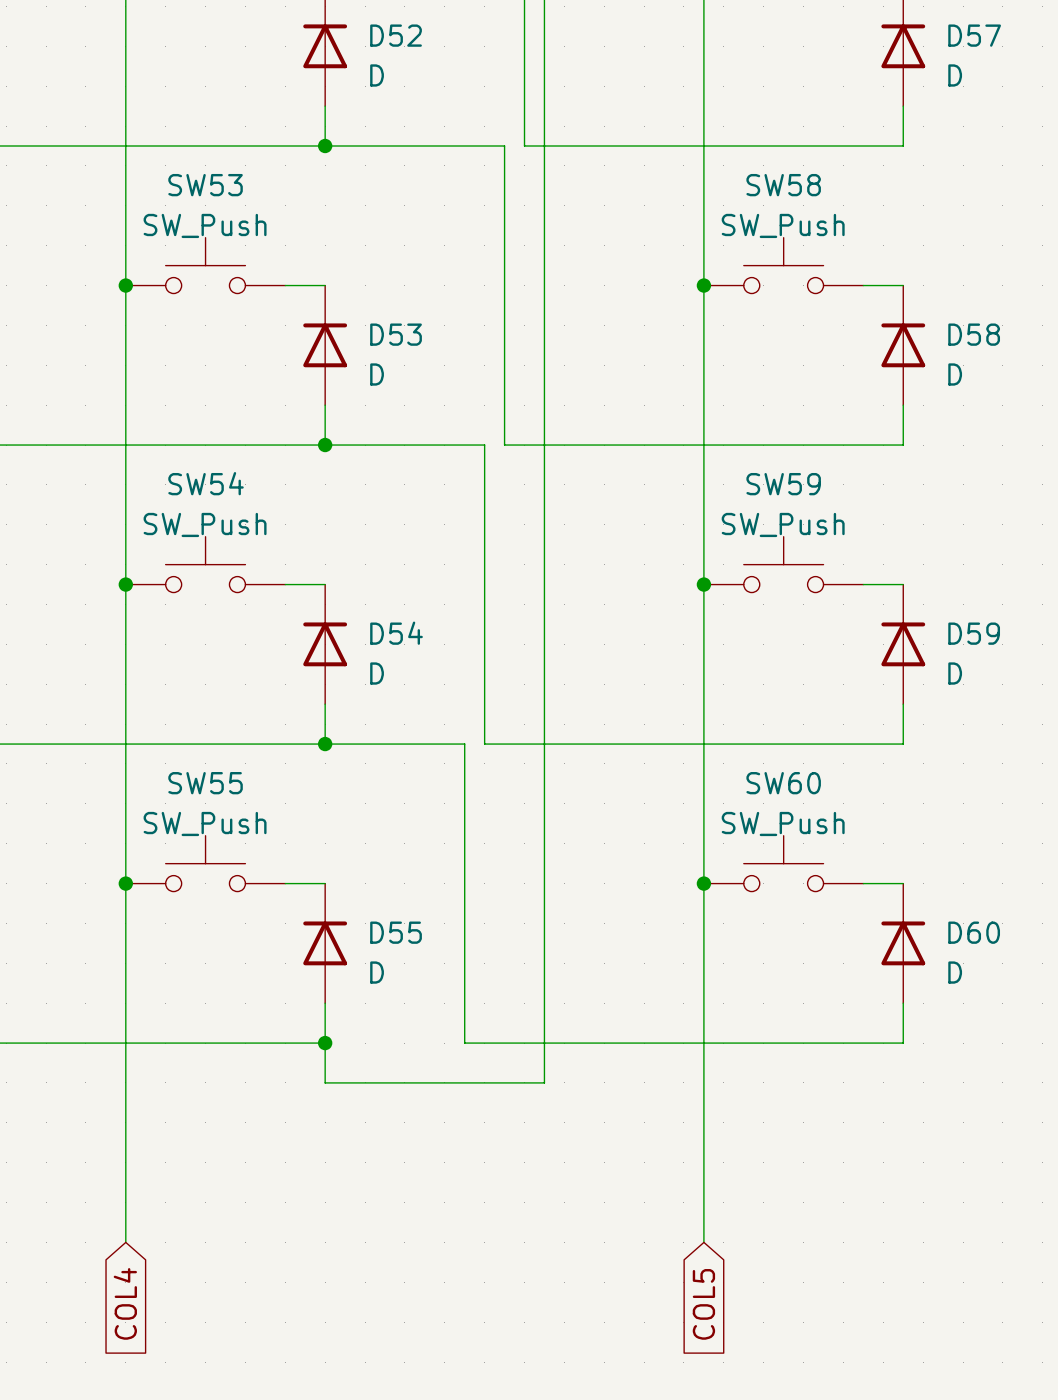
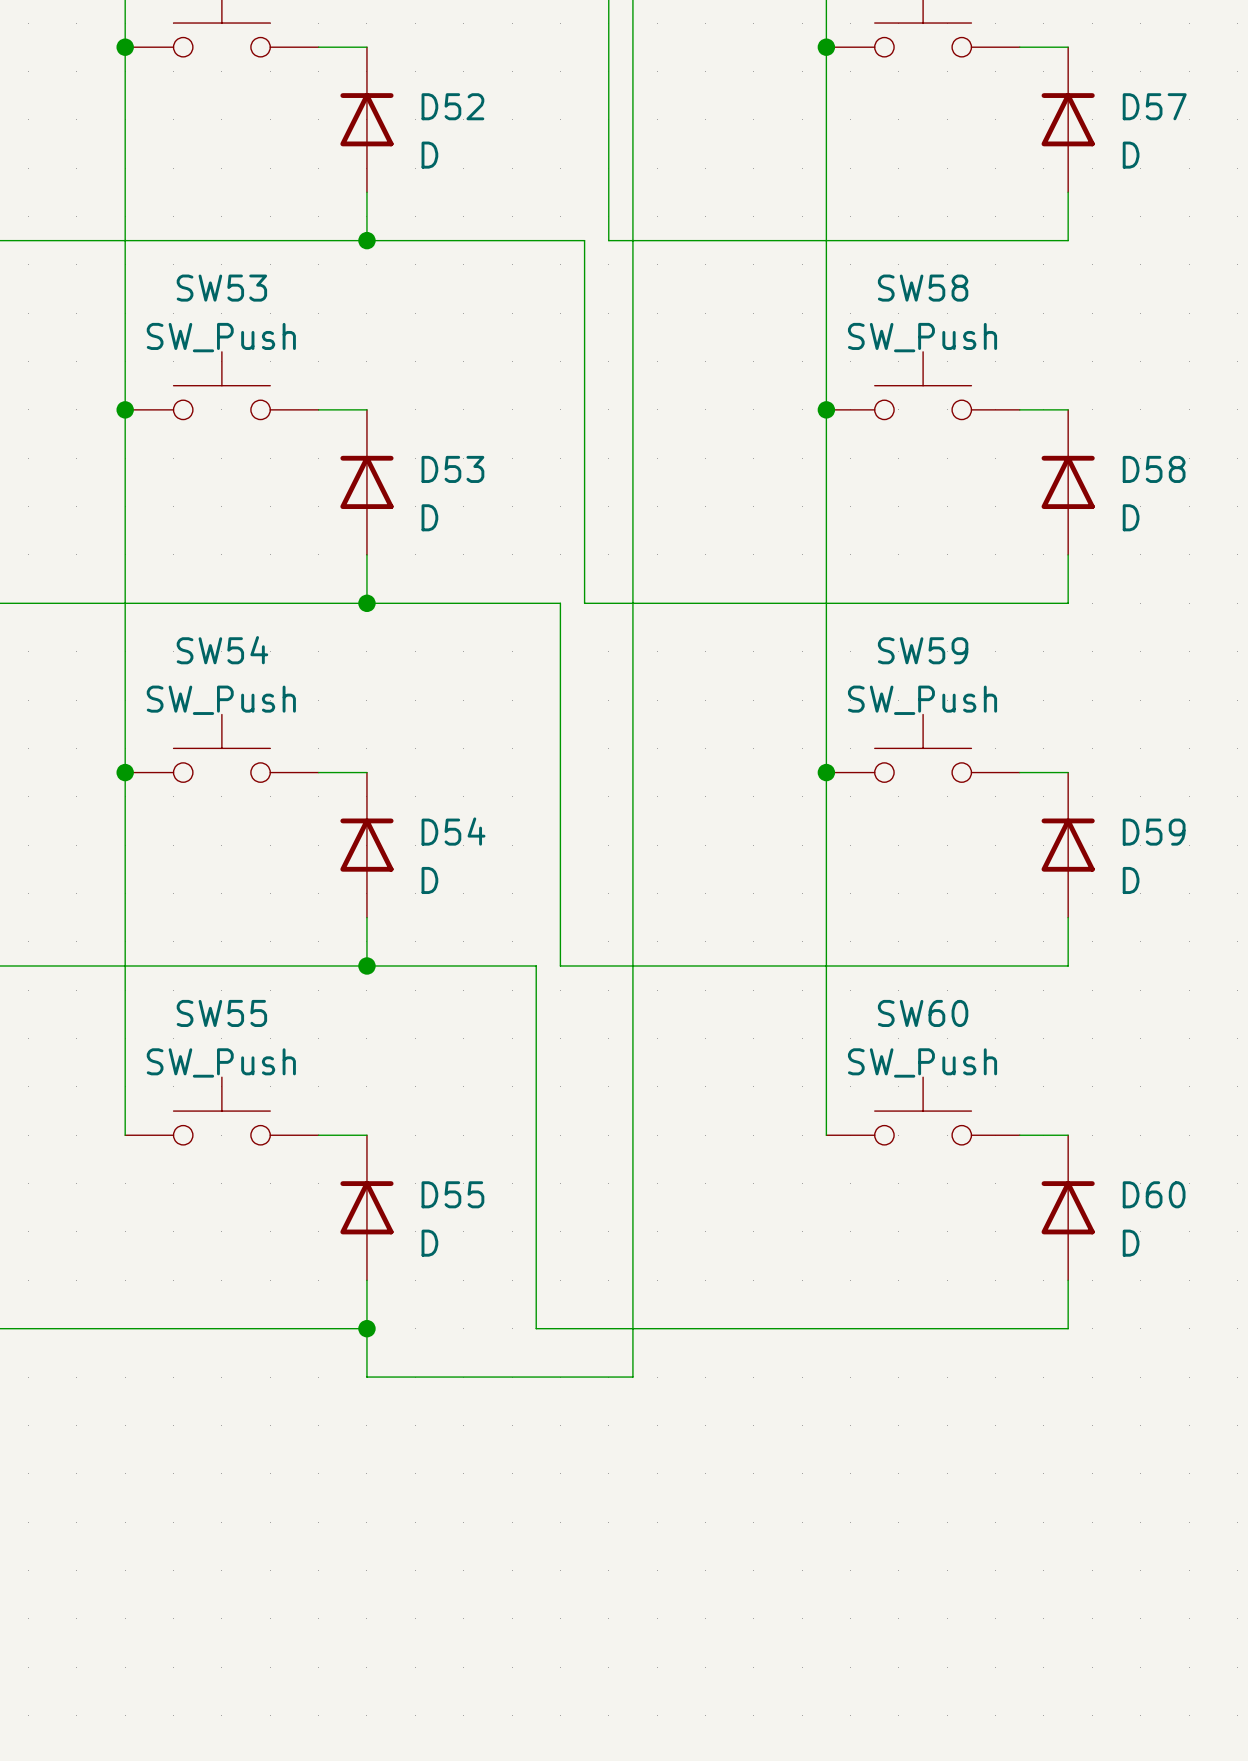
wire: (125, 883) (125, 1242) -> none
junction: (125, 883) -> none
wire: (703, 883) (703, 1242) -> none
junction: (703, 883) -> none
global label: COL4 (125, 1303) -> none
global label: COL5 (703, 1304) -> none

